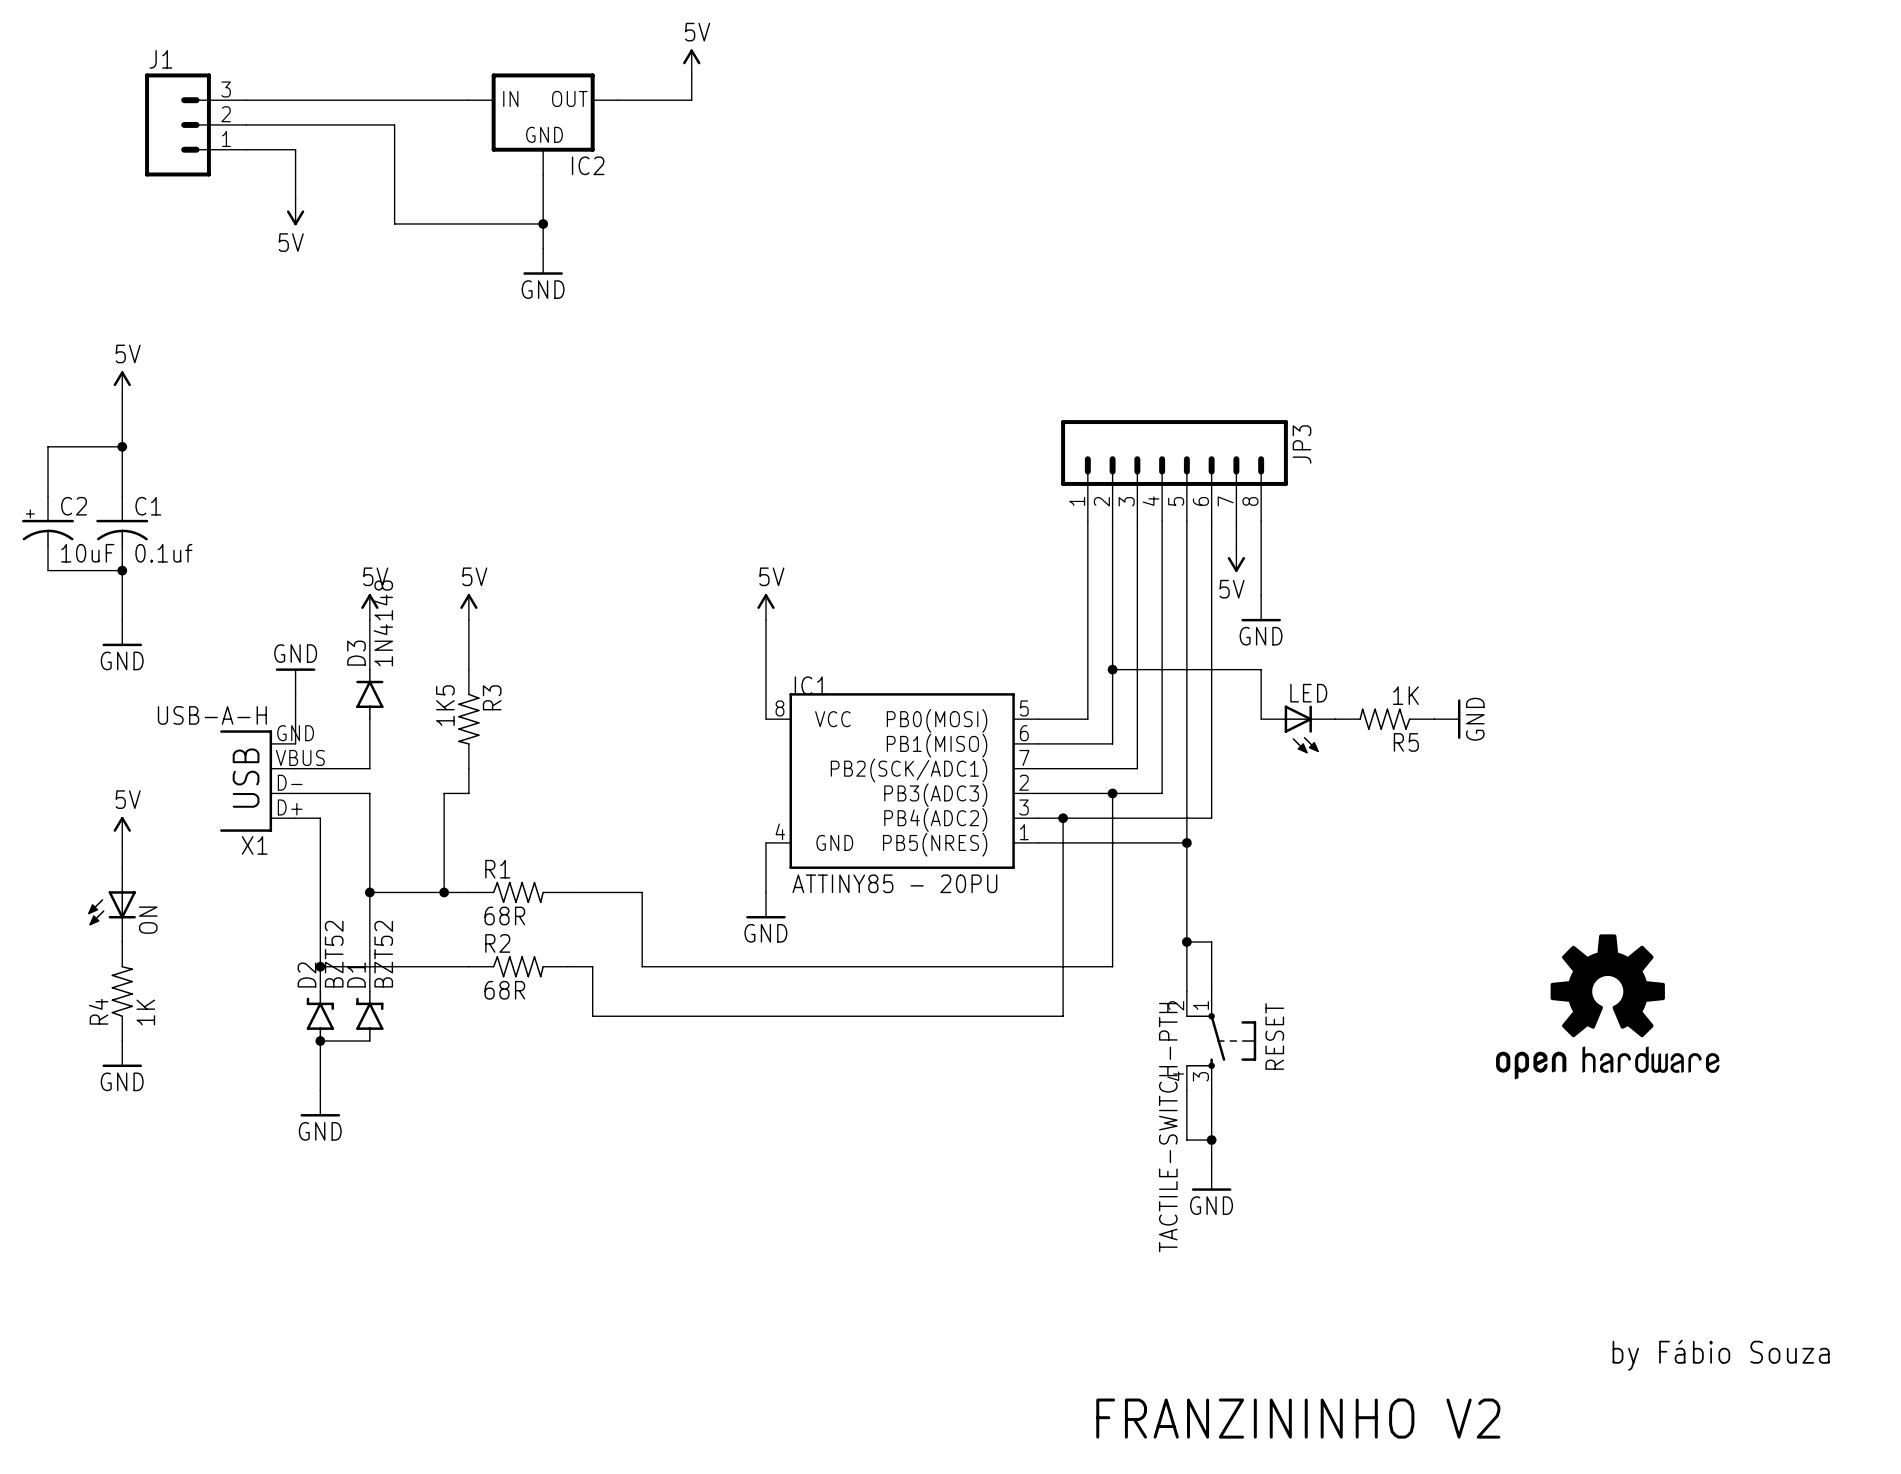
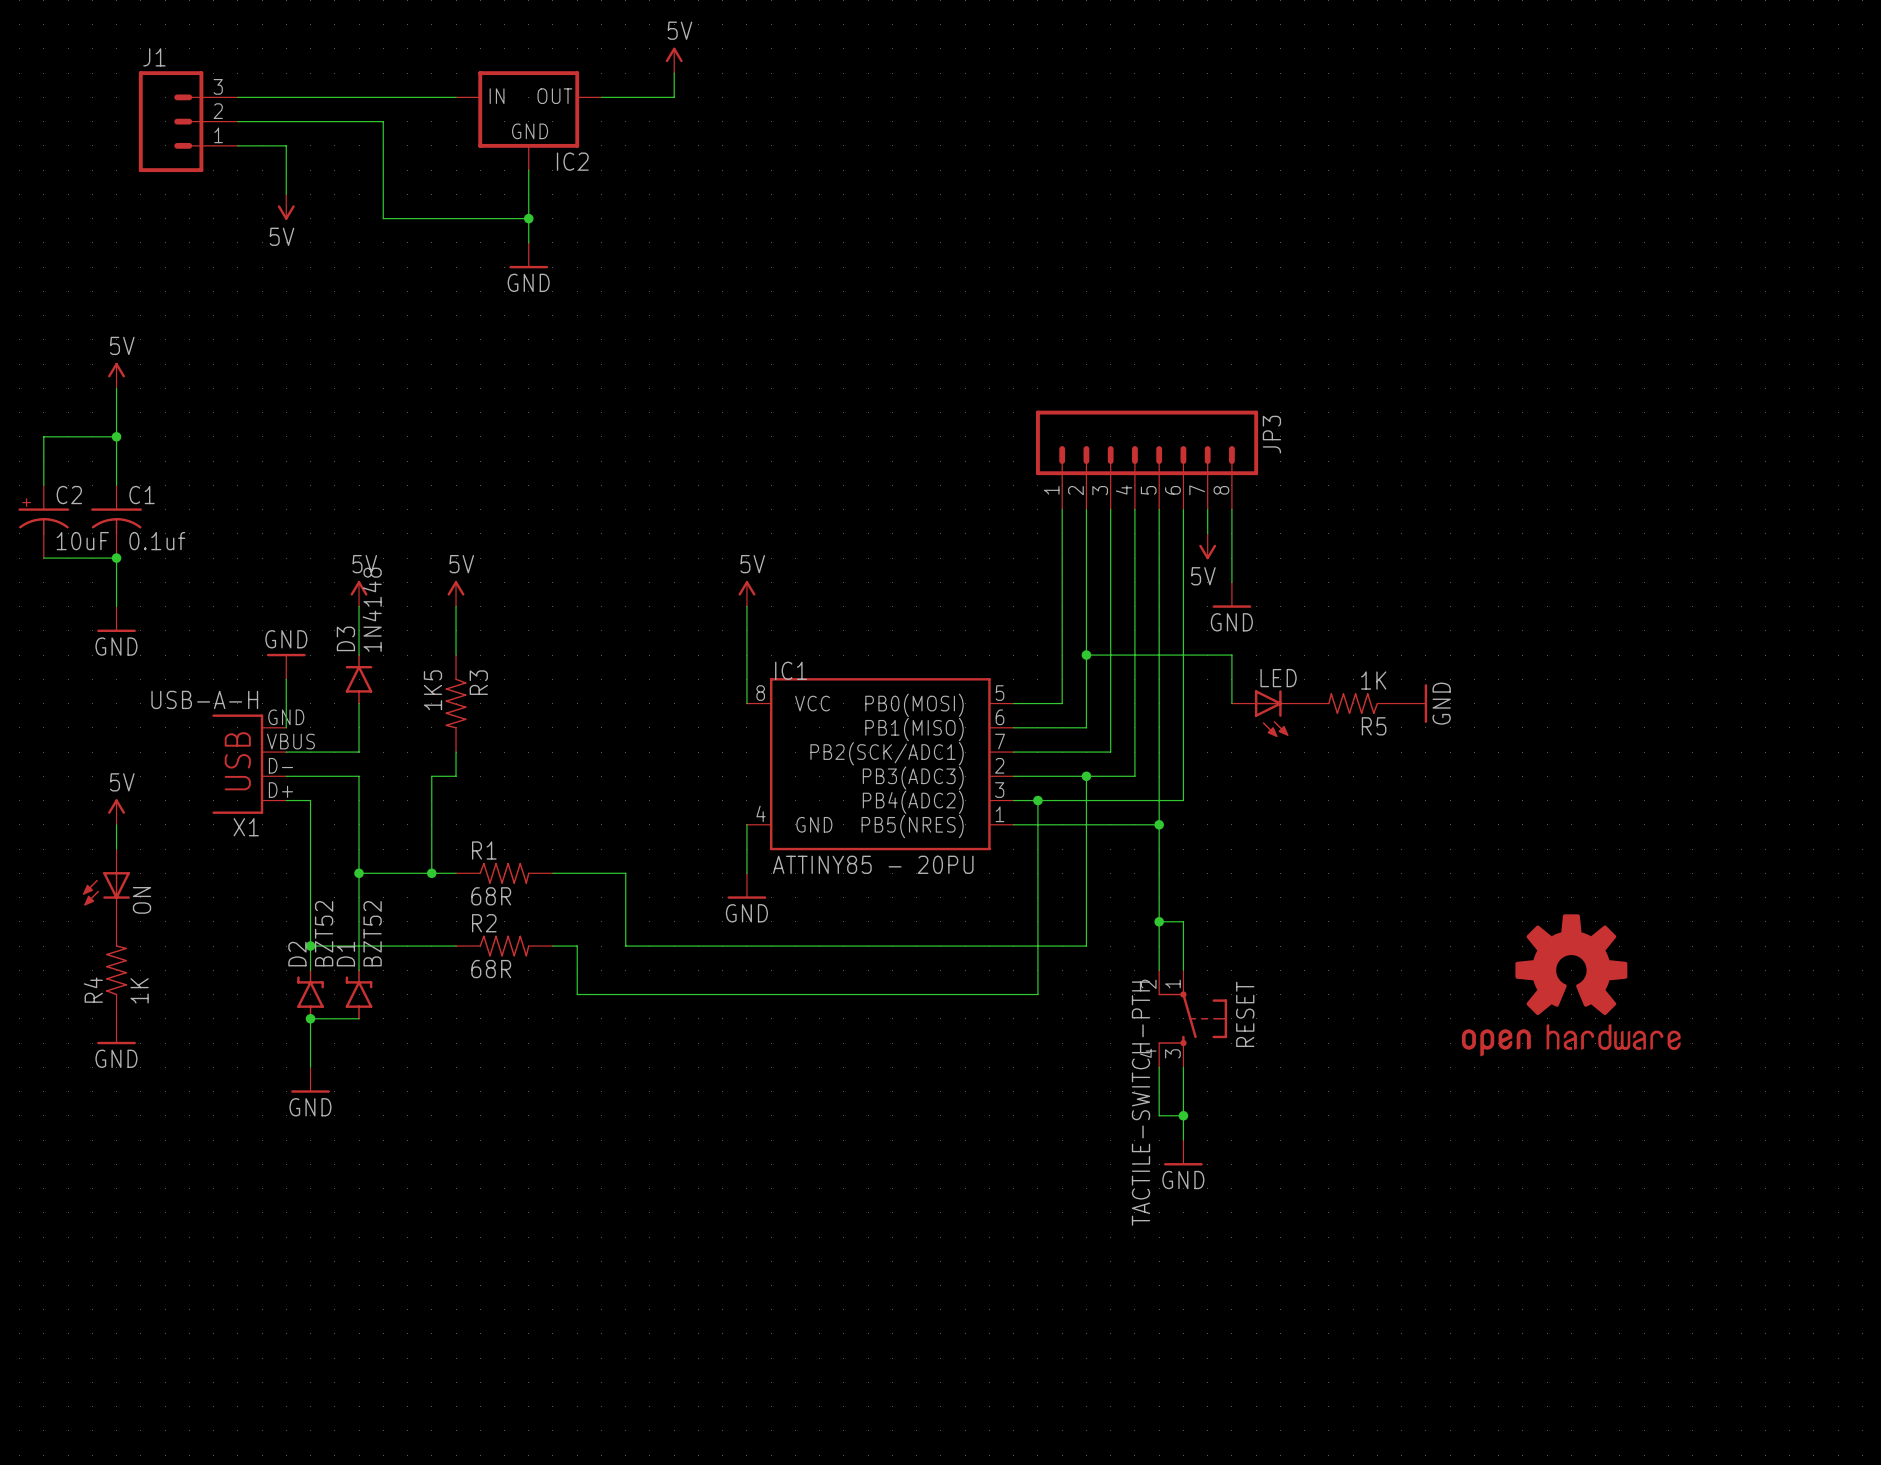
text: by Fábio Souza (1721, 1355) -> none
text: FRANZININHO V2 (1298, 1418) -> none

